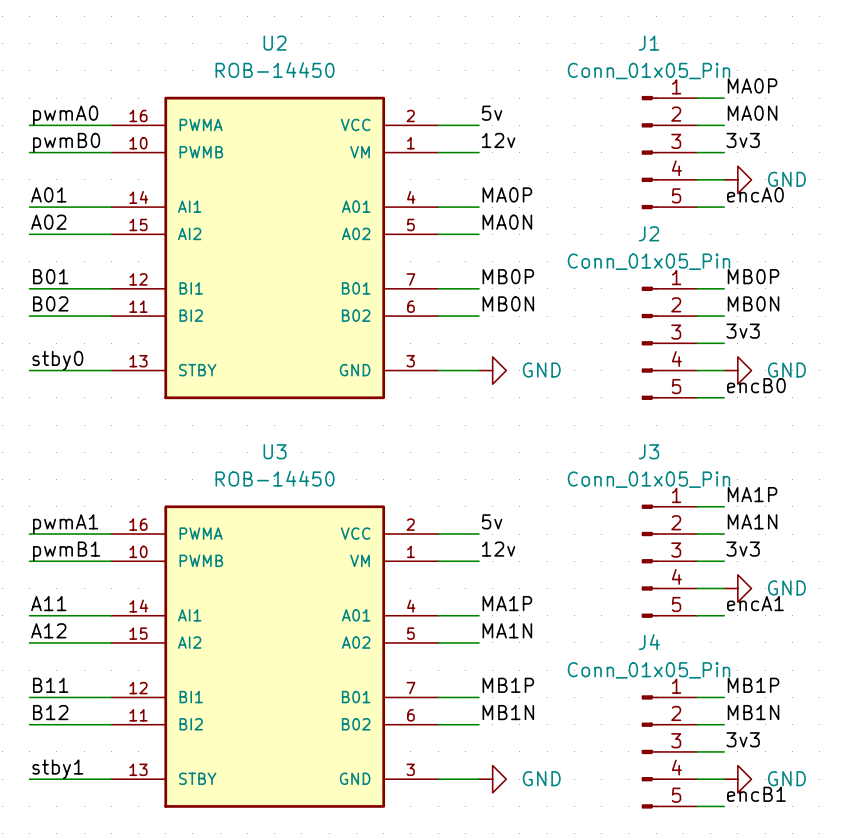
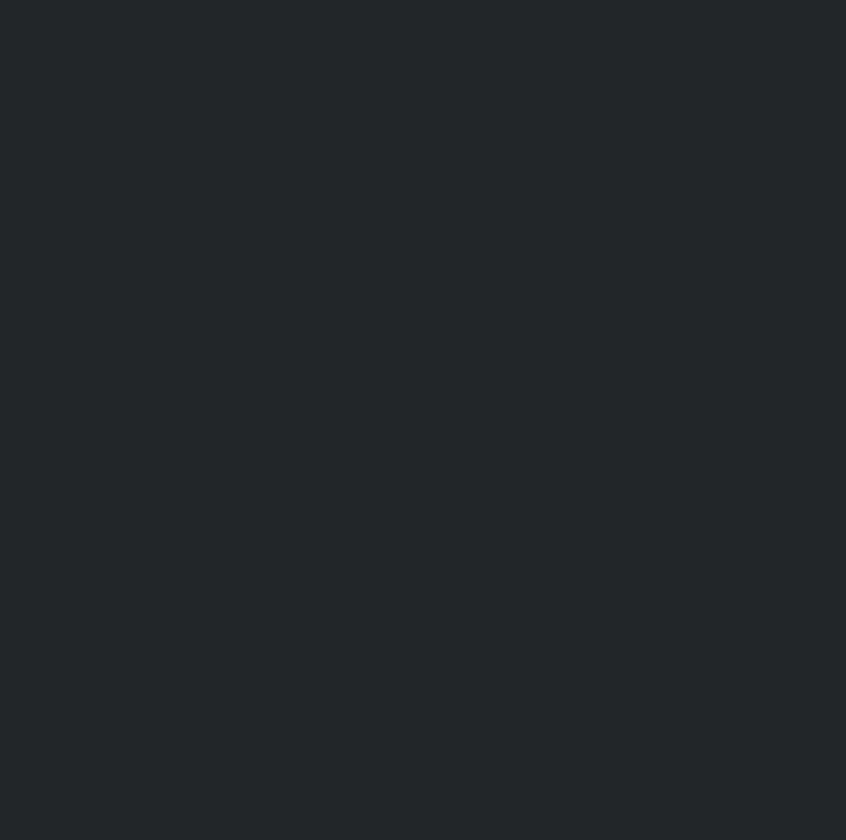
label: MA0P (752, 85) -> none
wire: (696, 98) (724, 98) -> none
label: 5v (492, 113) -> none
label: MA0N (752, 113) -> none
label: pwmA0 (65, 115) -> none
wire: (29, 125) (111, 125) -> none
wire: (438, 125) (479, 125) -> none
wire: (696, 125) (724, 125) -> none
label: 12v (498, 140) -> none
label: 3v3 (743, 140) -> none
label: pwmB0 (66, 142) -> none
wire: (29, 152) (111, 152) -> none
wire: (438, 152) (479, 152) -> none
J1: Conn_01x05_Pin (669, 152) -> none
wire: (696, 152) (724, 152) -> none
wire: (696, 179) (724, 179) -> none
power symbol: GND (737, 179) -> none
label: A01 (48, 194) -> none
label: MA0P (507, 194) -> none
label: encA0 (755, 194) -> none
wire: (29, 207) (111, 207) -> none
wire: (438, 207) (479, 207) -> none
wire: (696, 207) (724, 207) -> none
label: A02 (48, 222) -> none
label: MA0N (507, 222) -> none
wire: (29, 234) (111, 234) -> none
wire: (438, 234) (479, 234) -> none
U2: ROB-14450 (274, 247) -> none
label: B01 (50, 276) -> none
label: MB0P (508, 276) -> none
label: MB0P (753, 276) -> none
wire: (29, 288) (111, 288) -> none
wire: (438, 288) (479, 288) -> none
wire: (696, 288) (724, 288) -> none
label: B02 (50, 303) -> none
label: MB0N (508, 303) -> none
label: MB0N (753, 303) -> none
wire: (29, 316) (111, 316) -> none
wire: (438, 316) (479, 316) -> none
wire: (696, 316) (724, 316) -> none
label: 3v3 (743, 331) -> none
J2: Conn_01x05_Pin (669, 343) -> none
wire: (696, 343) (724, 343) -> none
label: stby0 (57, 360) -> none
wire: (29, 370) (111, 370) -> none
wire: (438, 370) (479, 370) -> none
power symbol: GND (492, 370) -> none
wire: (696, 370) (724, 370) -> none
power symbol: GND (737, 370) -> none
label: encB0 (756, 385) -> none
wire: (696, 397) (724, 397) -> none
label: MA1P (752, 494) -> none
wire: (696, 506) (724, 506) -> none
label: 5v (492, 521) -> none
label: MA1N (752, 521) -> none
label: pwmA1 (65, 524) -> none
wire: (29, 534) (111, 534) -> none
wire: (438, 534) (479, 534) -> none
wire: (696, 534) (724, 534) -> none
label: 12v (498, 549) -> none
label: 3v3 (743, 549) -> none
label: pwmB1 (66, 551) -> none
wire: (29, 561) (111, 561) -> none
wire: (438, 561) (479, 561) -> none
J3: Conn_01x05_Pin (669, 561) -> none
wire: (696, 561) (724, 561) -> none
wire: (696, 588) (724, 588) -> none
power symbol: GND (737, 588) -> none
label: A11 (48, 603) -> none
label: MA1P (507, 603) -> none
label: encA1 (755, 603) -> none
wire: (29, 615) (111, 615) -> none
wire: (438, 615) (479, 615) -> none
wire: (696, 615) (724, 615) -> none
label: A12 (48, 630) -> none
label: MA1N (507, 630) -> none
wire: (29, 642) (111, 642) -> none
wire: (438, 642) (479, 642) -> none
U3: ROB-14450 (274, 656) -> none
label: B11 (50, 685) -> none
label: MB1P (508, 685) -> none
label: MB1P (753, 685) -> none
wire: (29, 697) (111, 697) -> none
wire: (438, 697) (479, 697) -> none
wire: (696, 697) (724, 697) -> none
label: B12 (50, 712) -> none
label: MB1N (508, 712) -> none
label: MB1N (753, 712) -> none
wire: (29, 724) (111, 724) -> none
wire: (438, 724) (479, 724) -> none
wire: (696, 724) (724, 724) -> none
label: 3v3 (743, 739) -> none
J4: Conn_01x05_Pin (669, 751) -> none
wire: (696, 751) (724, 751) -> none
label: stby1 (57, 769) -> none
wire: (29, 779) (111, 779) -> none
wire: (438, 779) (479, 779) -> none
power symbol: GND (492, 779) -> none
wire: (696, 779) (724, 779) -> none
power symbol: GND (737, 779) -> none
label: encB1 (756, 794) -> none
wire: (696, 806) (724, 806) -> none

